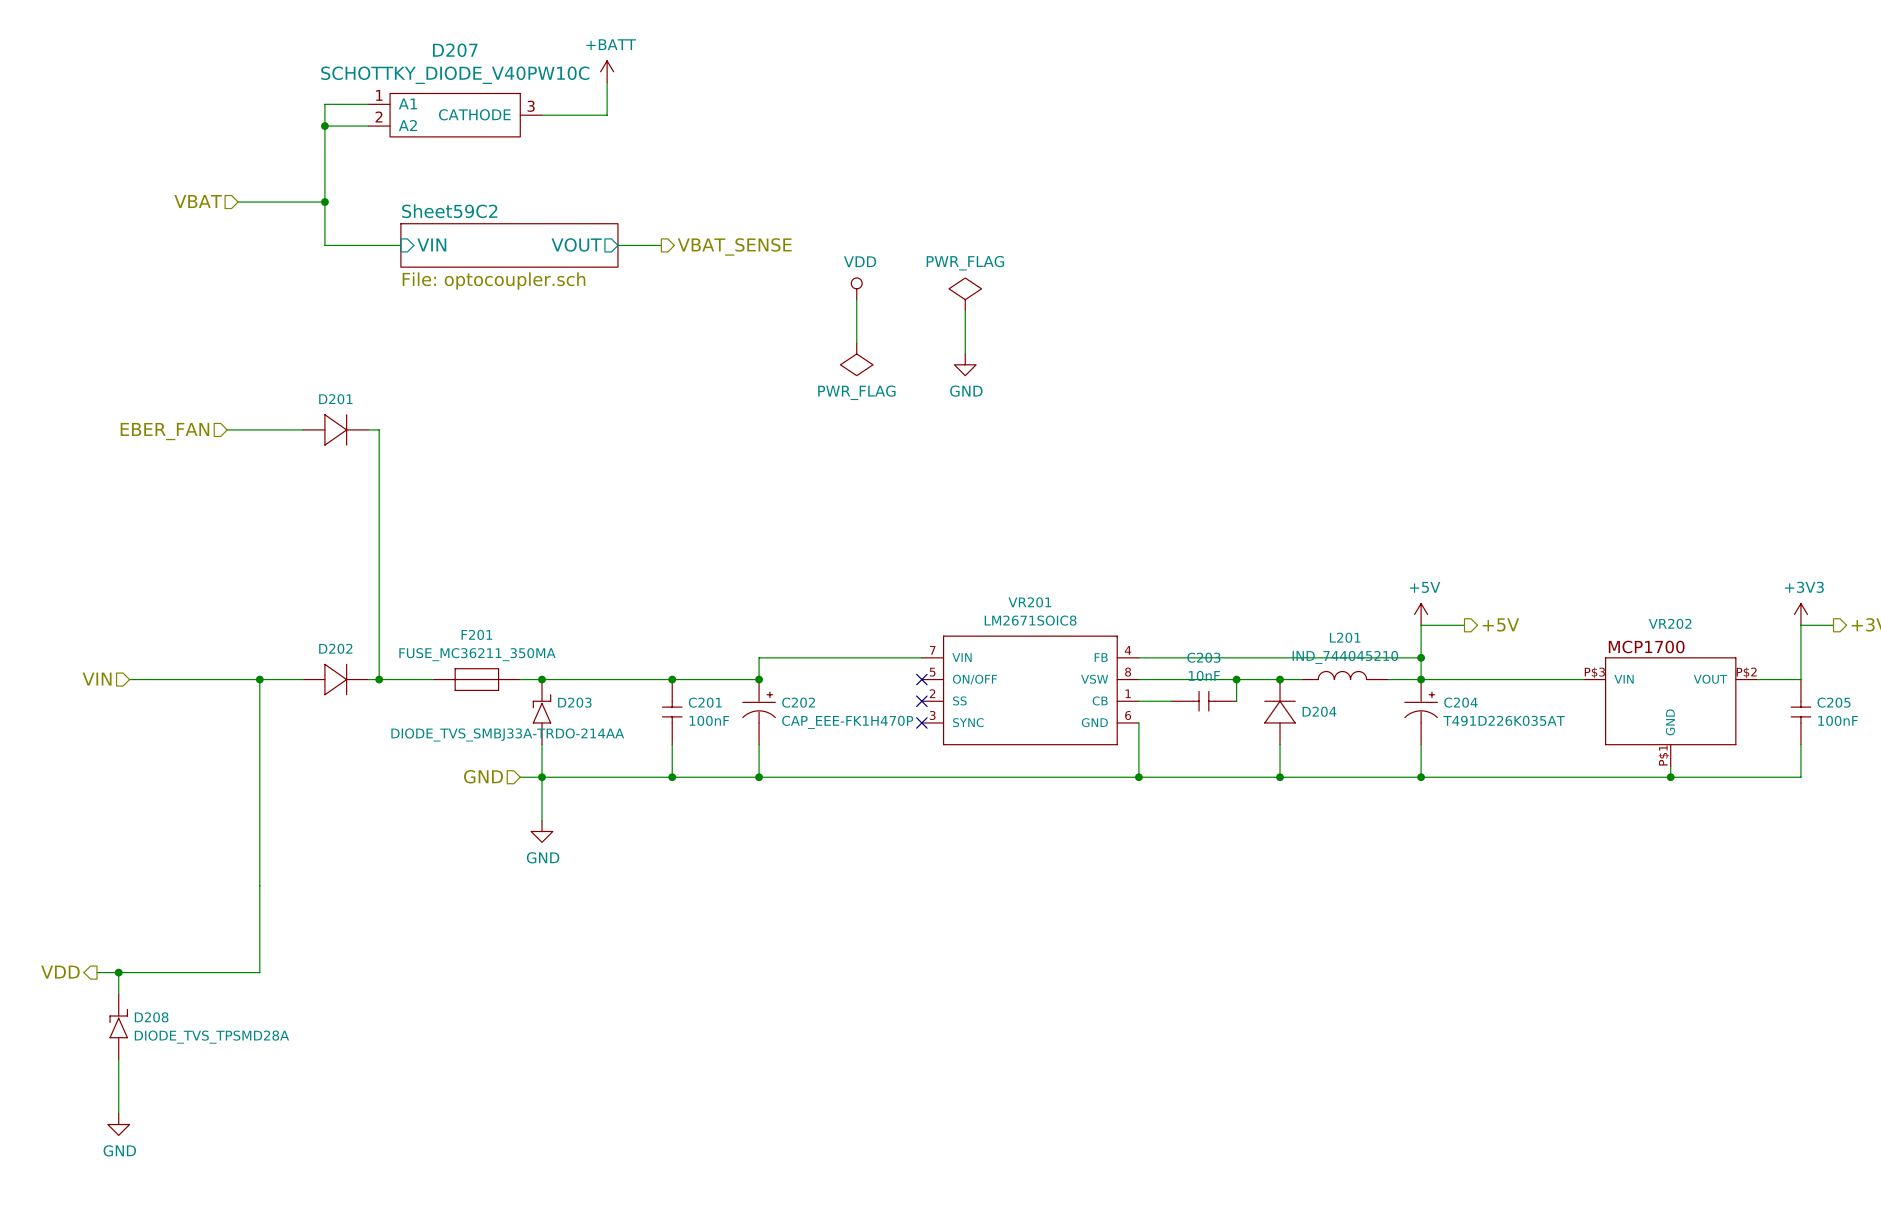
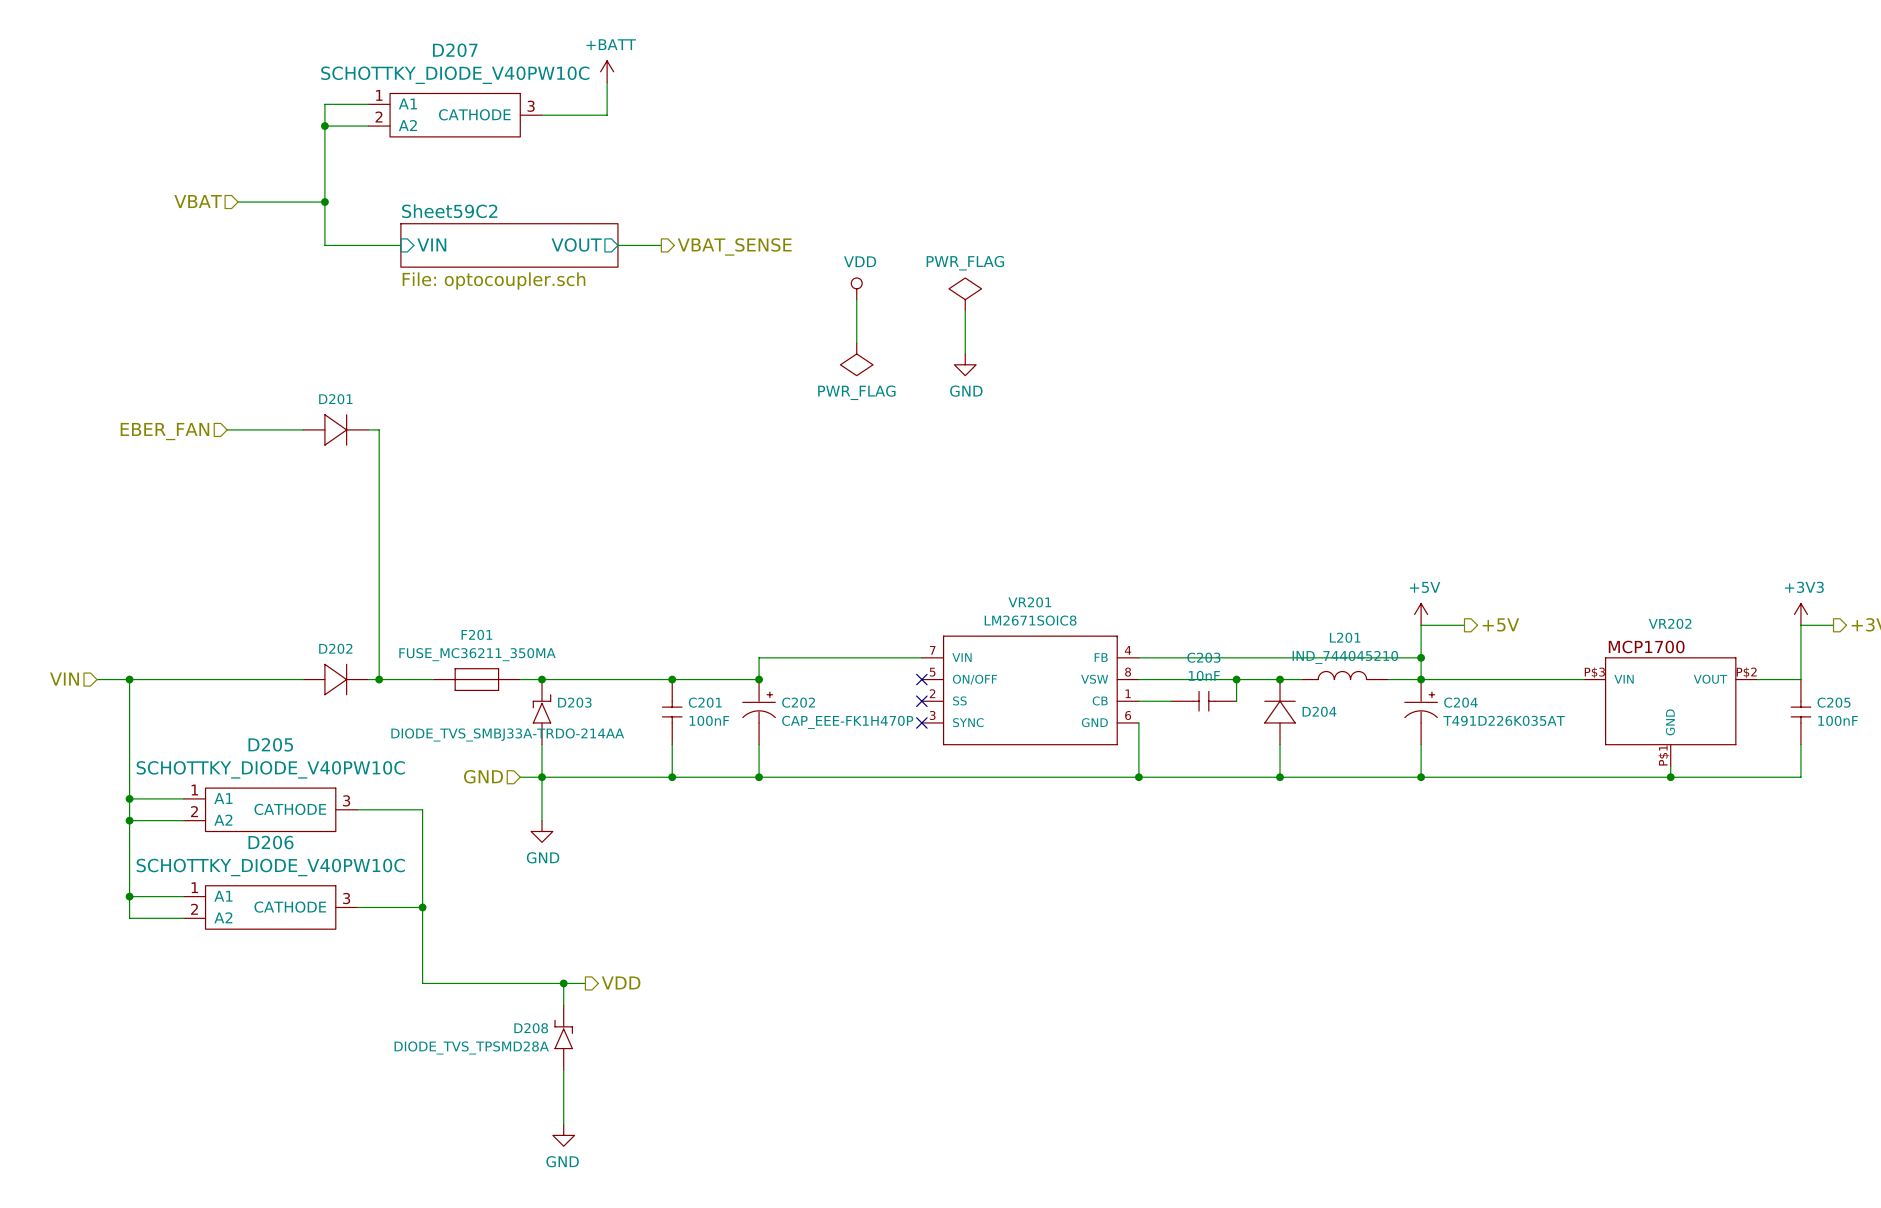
wire: none -> (97, 679) (129, 679) (129, 918) (183, 918)
hierarchical label position: VIN (97, 679) -> VIN (64, 679)
junction: none -> (129, 679)
wire: (259, 679) (259, 972) (97, 972) -> none
junction: (259, 679) -> none
wire: none -> (129, 798) (183, 798)
junction: none -> (129, 798)
D205: none -> SCHOTTKY_DIODE_V40PW10C (270, 809)
wire: none -> (357, 809) (422, 809) (422, 983) (585, 983)
wire: none -> (129, 820) (183, 820)
junction: none -> (129, 820)
wire: none -> (129, 896) (183, 896)
junction: none -> (129, 896)
D206: none -> SCHOTTKY_DIODE_V40PW10C (270, 907)
wire: none -> (357, 907) (422, 907)
junction: none -> (422, 907)
hierarchical label: VDD (60, 972) -> none
wire: (118, 972) (118, 994) -> none
junction: (118, 972) -> none
hierarchical label: none -> VDD (621, 982)
wire: none -> (563, 983) (563, 1005)
junction: none -> (563, 983)
D208 flip: as is (118, 1023) -> left-right (563, 1034)
D208 position: (118, 1026) -> (563, 1037)
wire: (118, 1059) (118, 1113) -> none
wire: none -> (563, 1070) (563, 1124)
power symbol: GND (118, 1124) -> none
power symbol: none -> GND (563, 1135)

